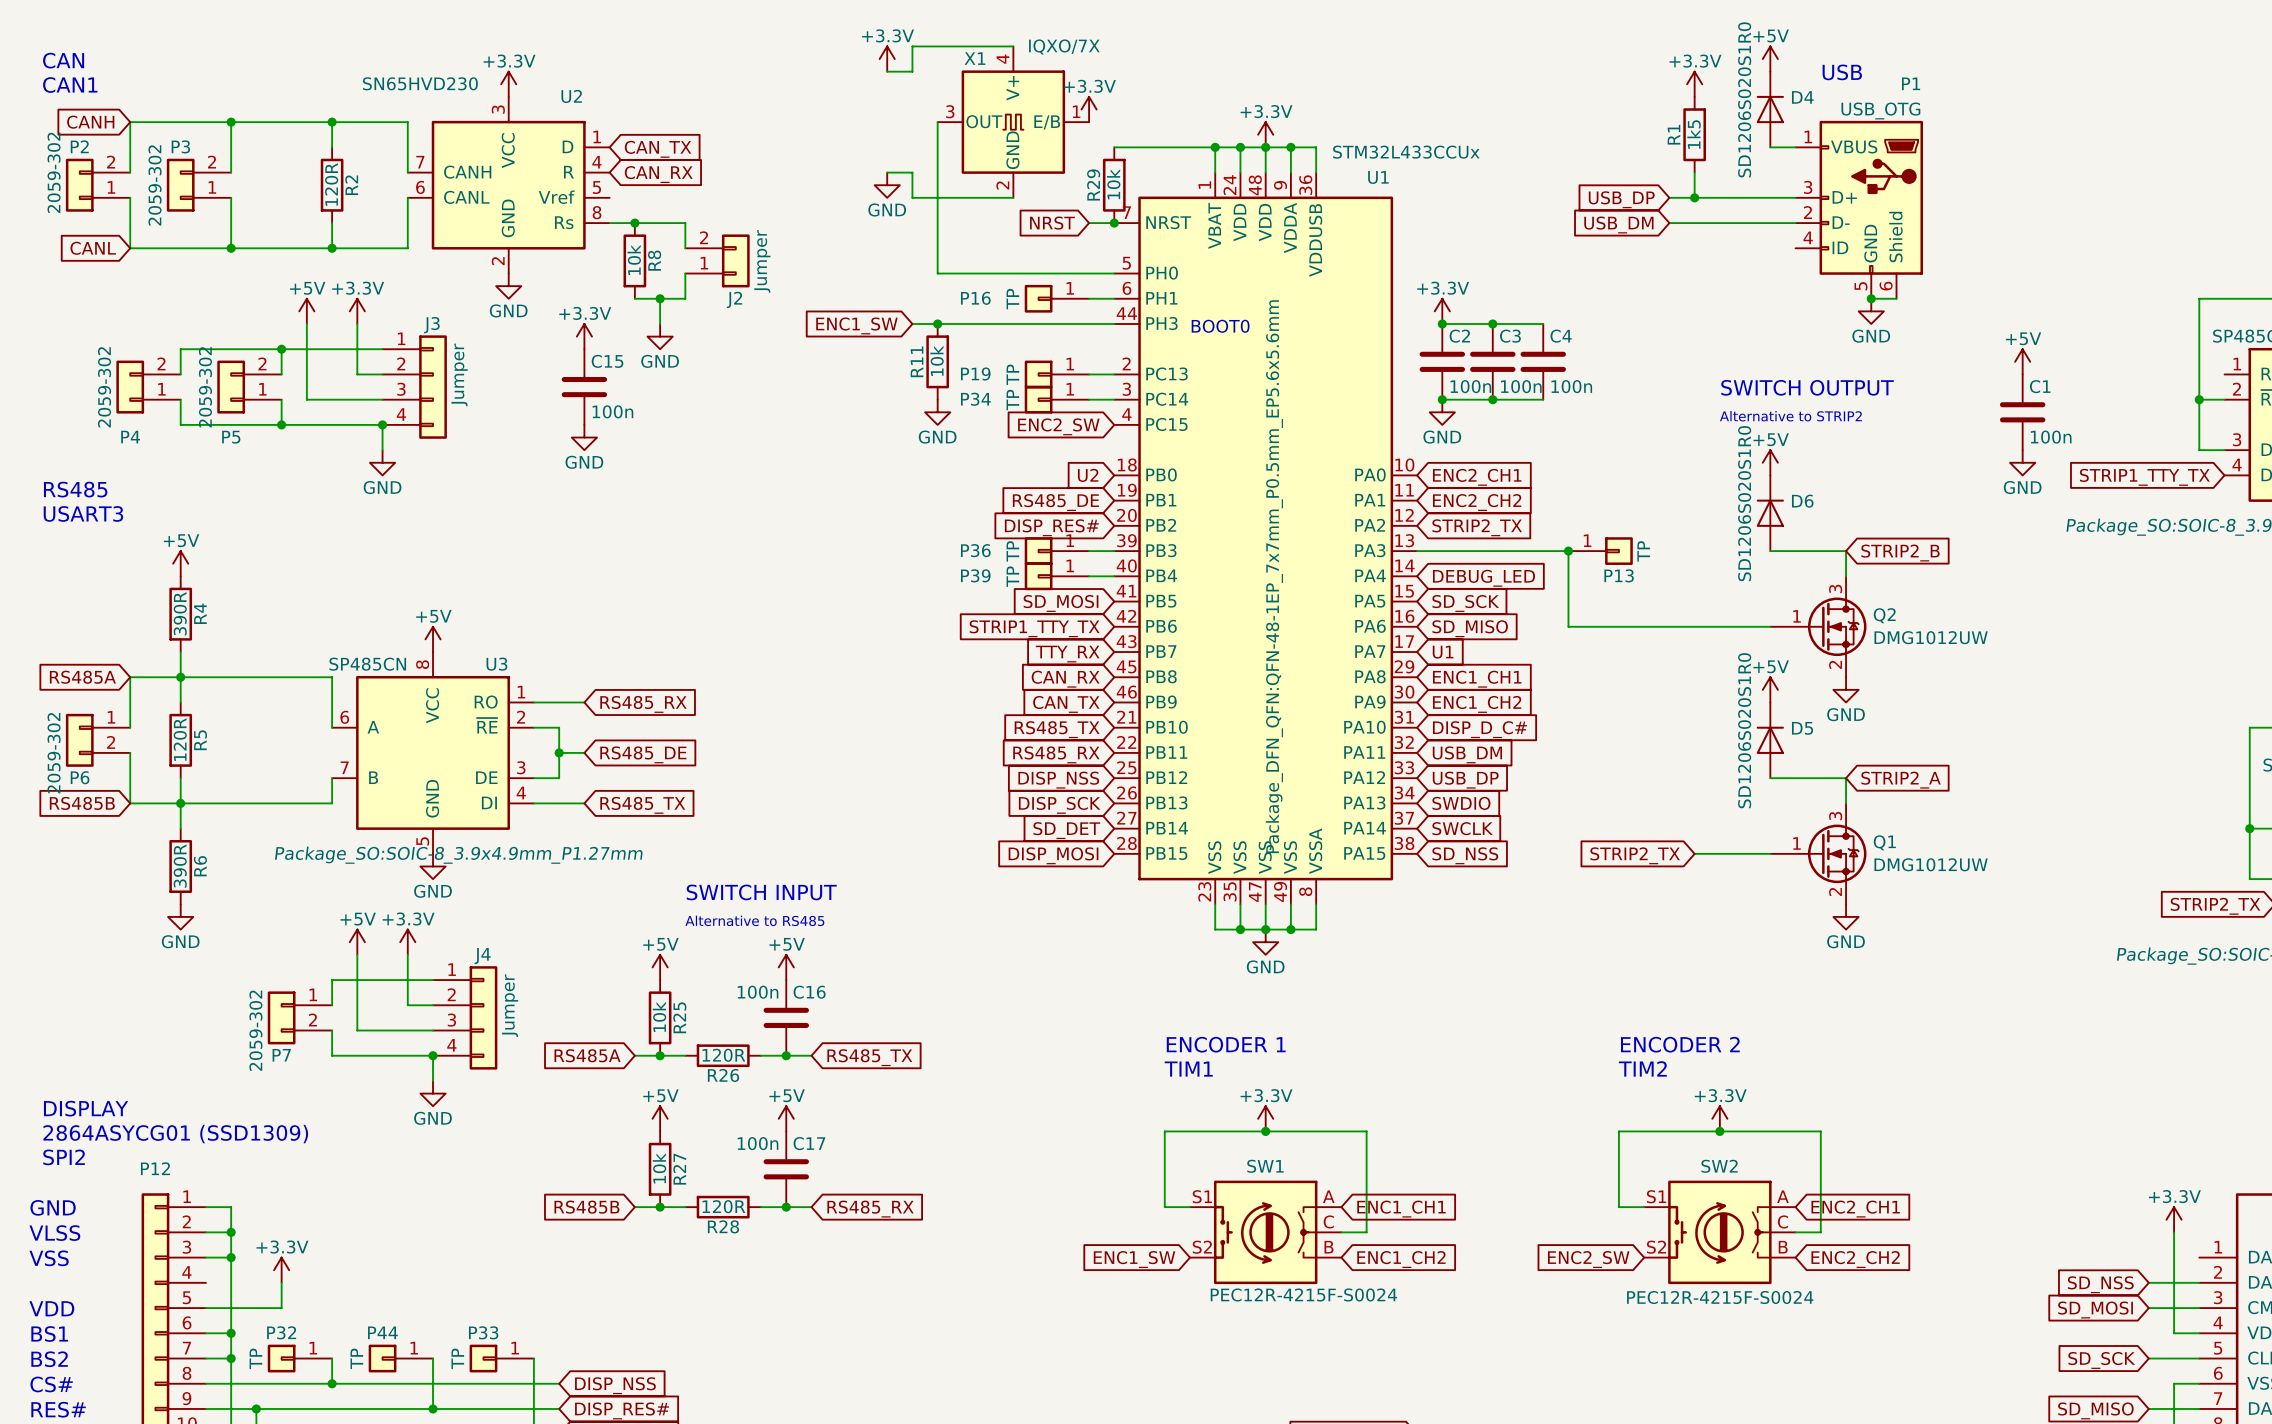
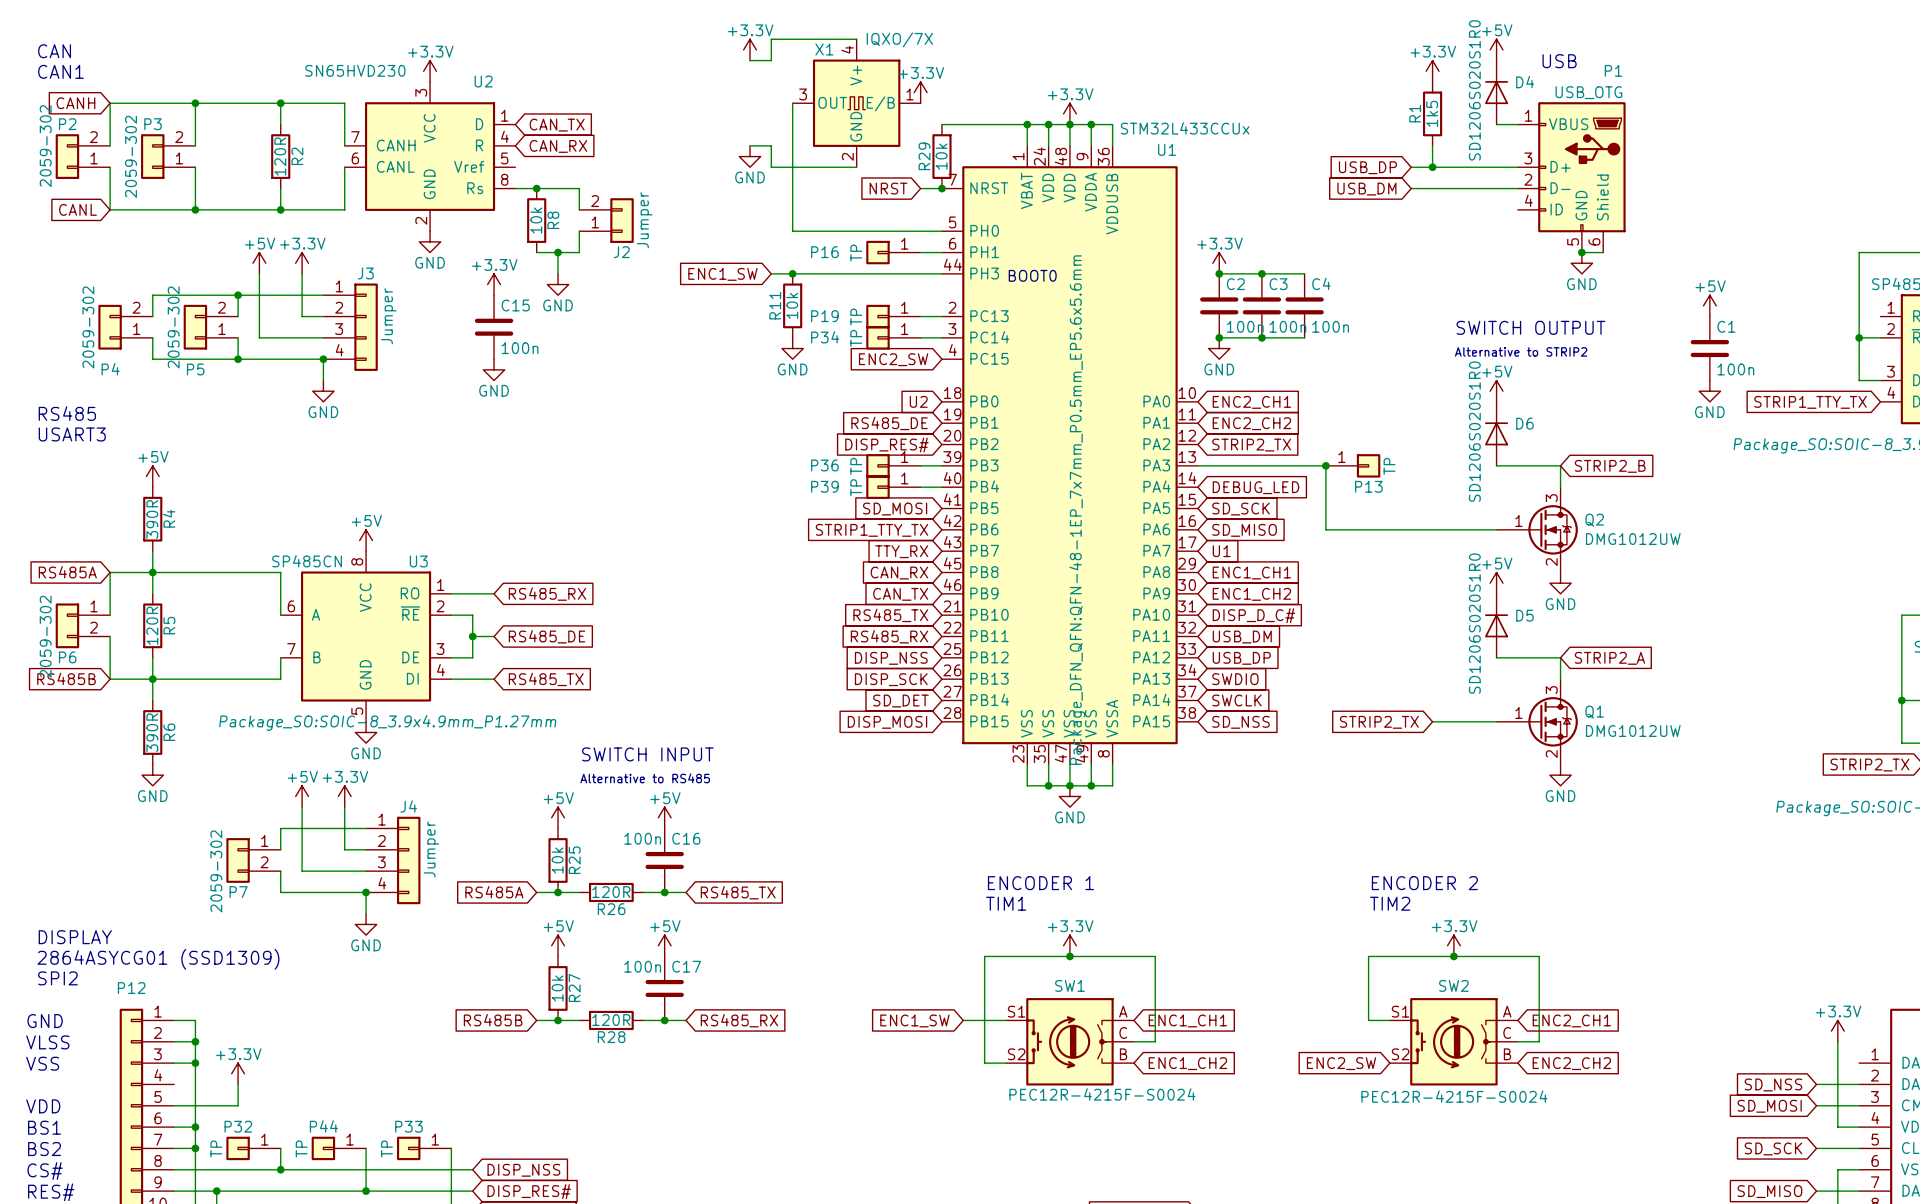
wire: none -> (963, 1020) (984, 1020) (984, 1063) (1005, 1063)
global label position: ENC1_SW (1134, 1259) -> ENC1_SW (914, 1020)

